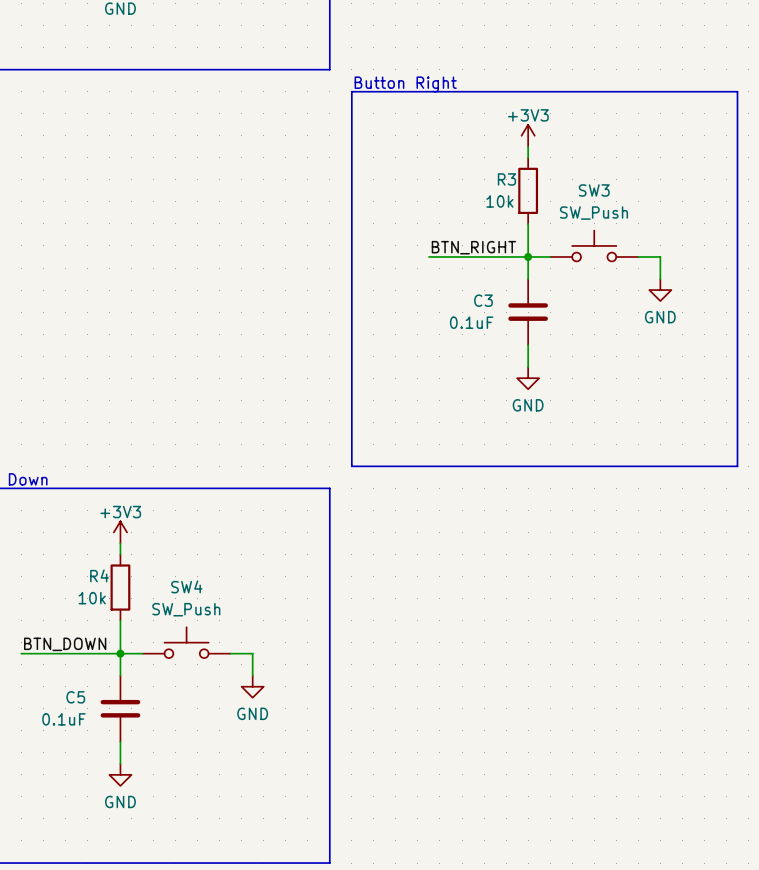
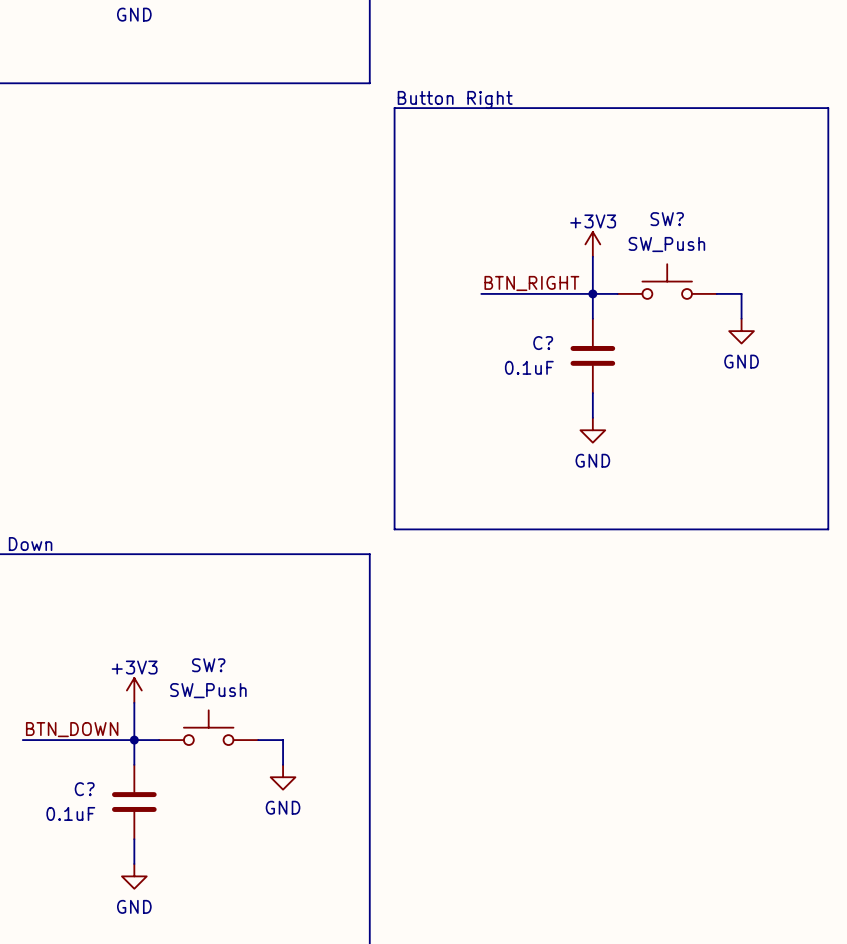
power symbol position: +3V3 (528, 135) -> +3V3 (592, 244)
wire: (528, 146) (528, 157) -> none
R3: 10k (528, 190) -> none
SW3 name: SW3 (594, 190) -> SW? (667, 219)
C3 name: C3 (483, 300) -> C? (543, 343)
power symbol position: +3V3 (120, 532) -> +3V3 (134, 690)
wire: (120, 543) (120, 554) -> none
SW4 name: SW4 (186, 586) -> SW? (208, 665)
R4: 10k (120, 587) -> none
C5 name: C5 (75, 697) -> C? (84, 789)

